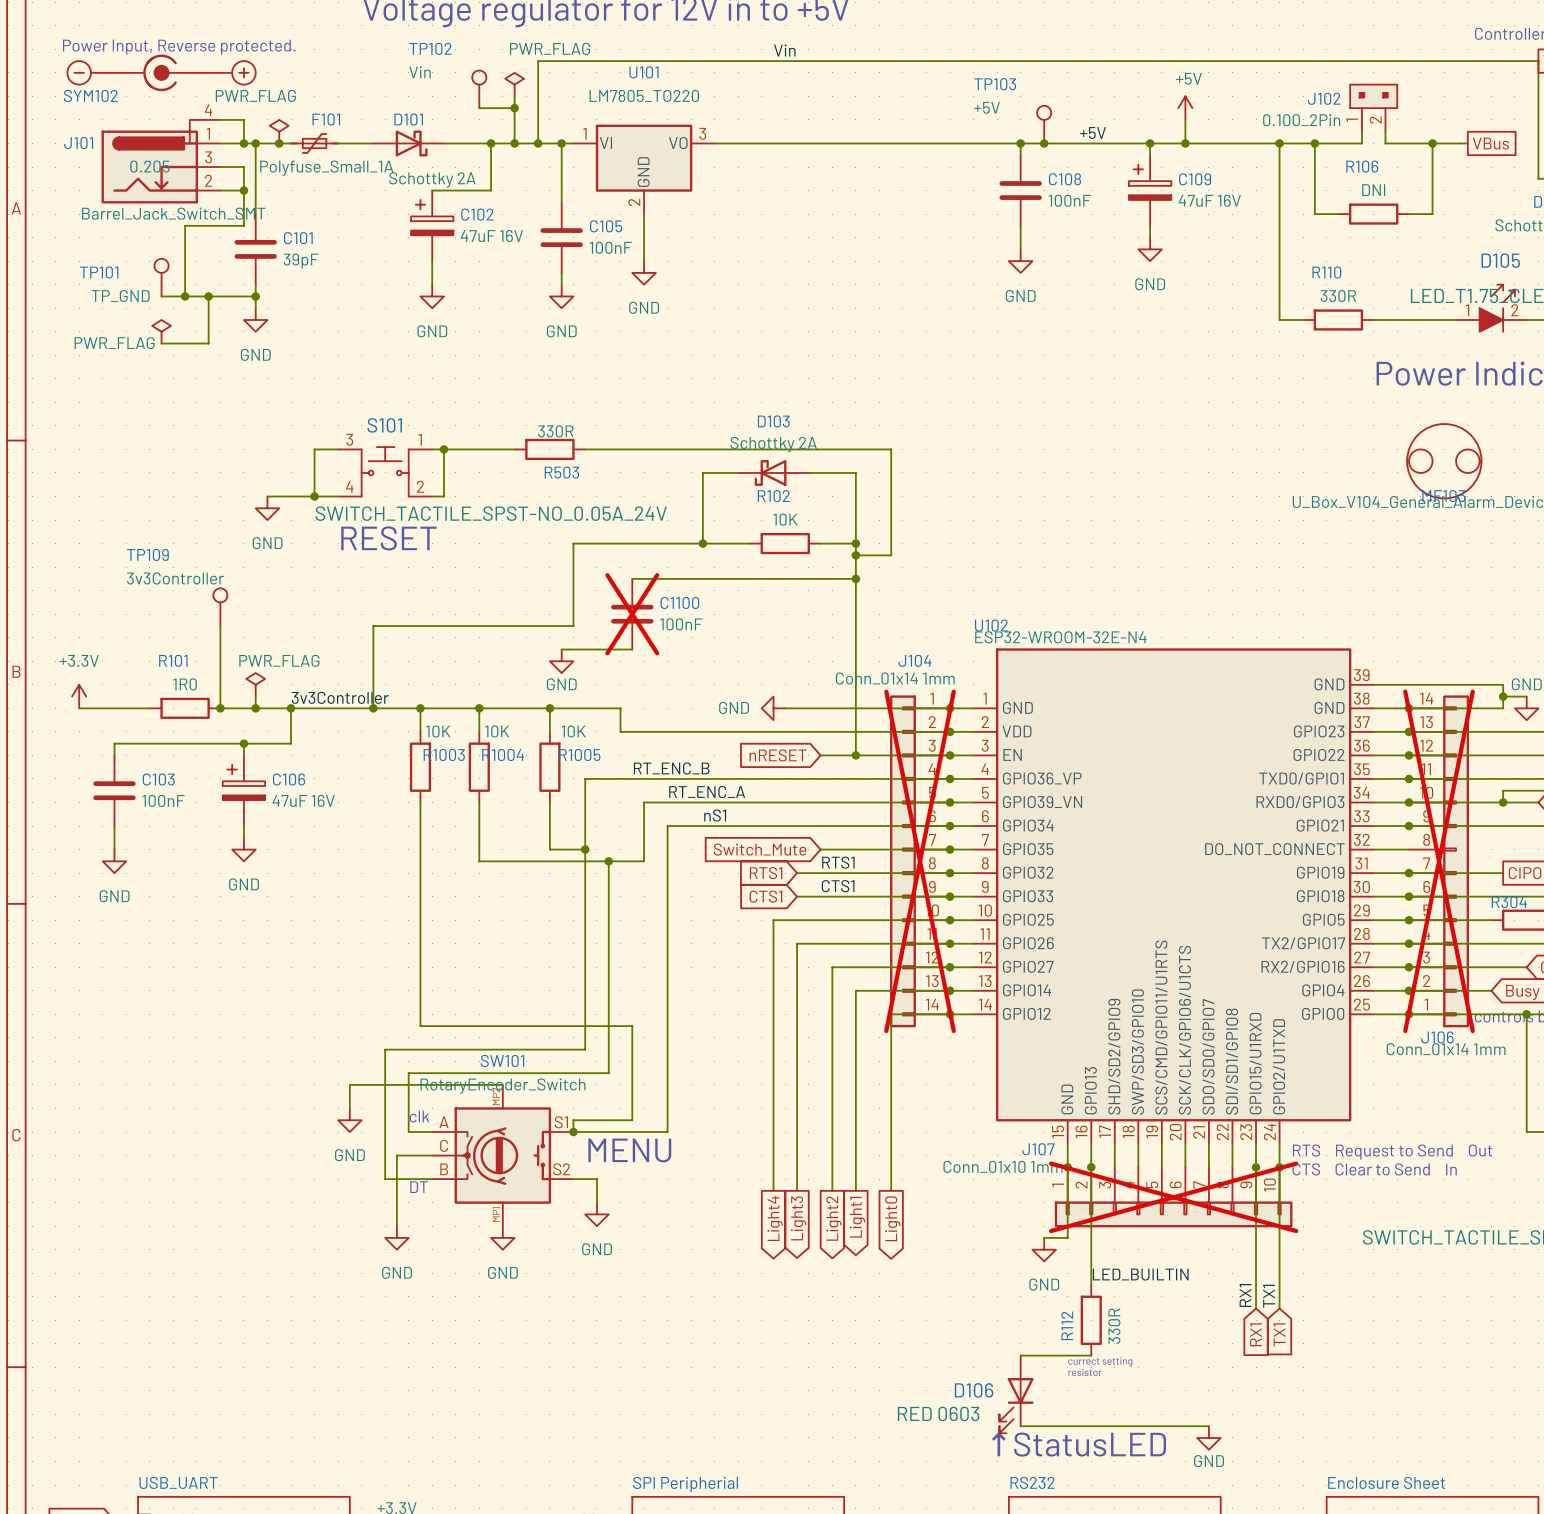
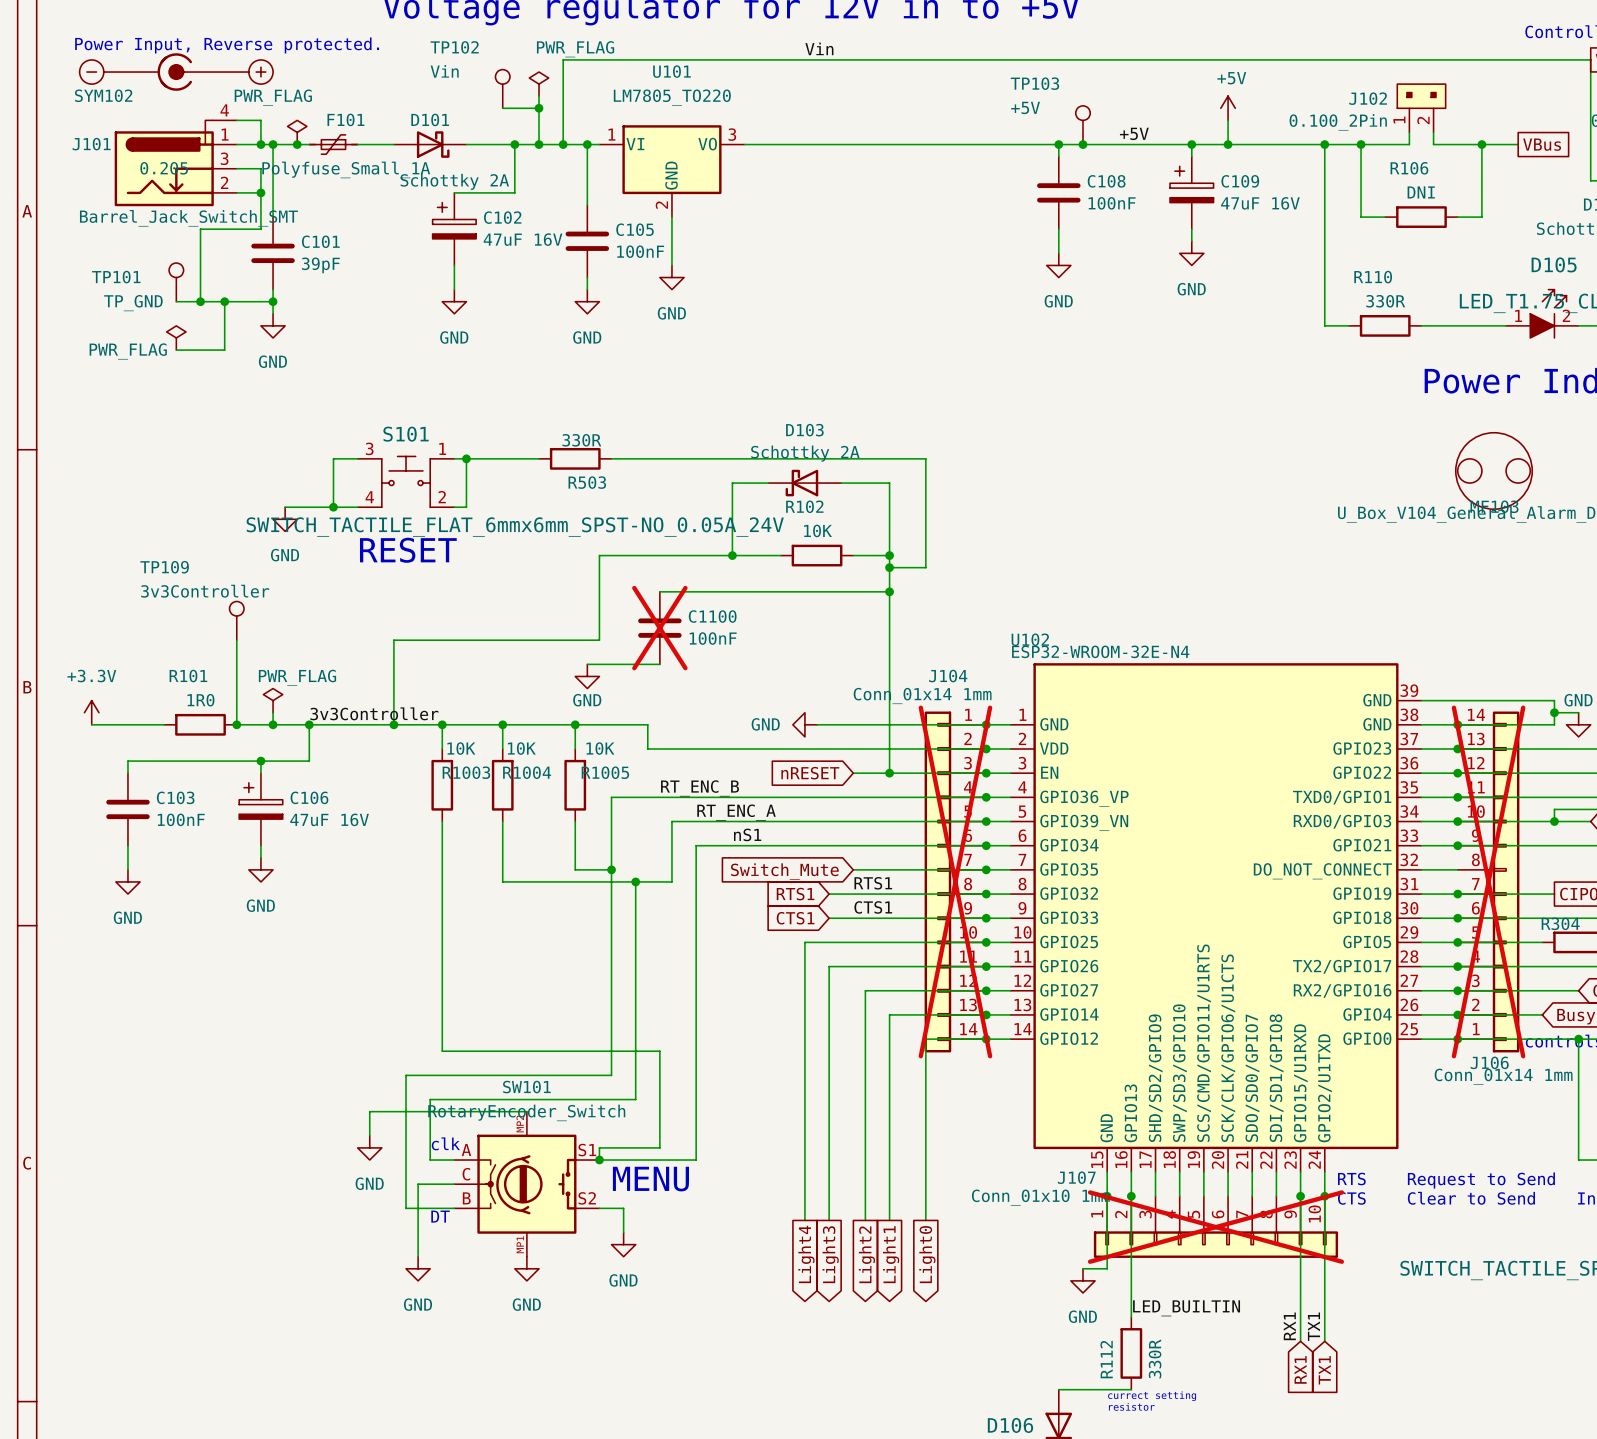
S101 value: SWITCH_TACTILE_SPST-NO_0.05A_24V (491, 513) -> SWITCH_TACTILE_FLAT_6mmx6mm_SPST-NO_0.05A_24V (515, 527)

